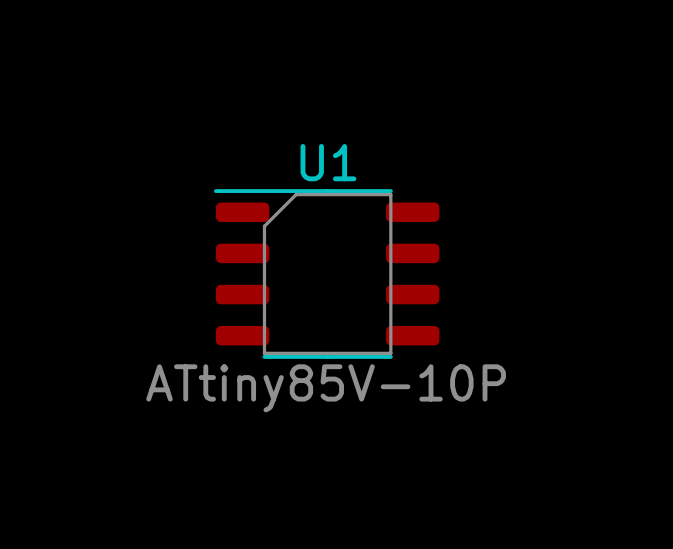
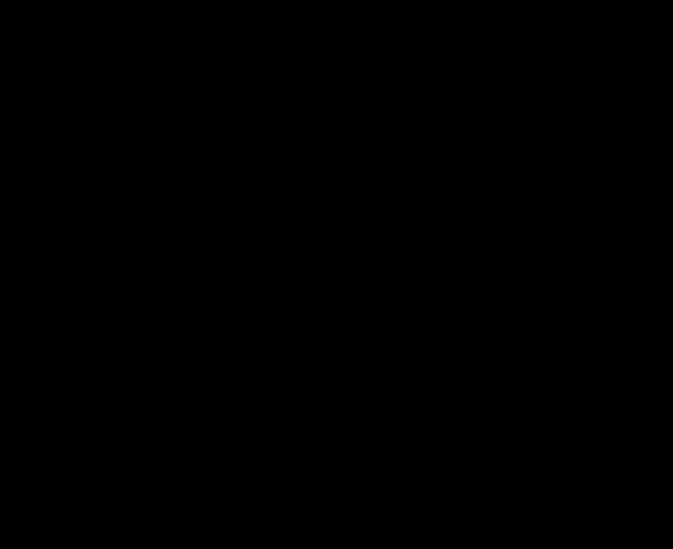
U1: ATtiny85V-10P (326, 273) -> none

